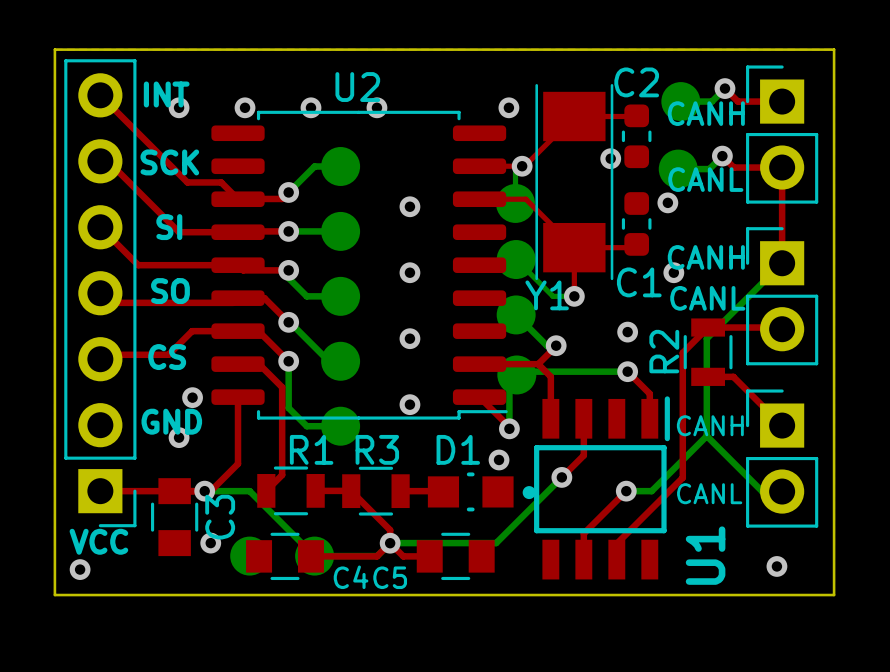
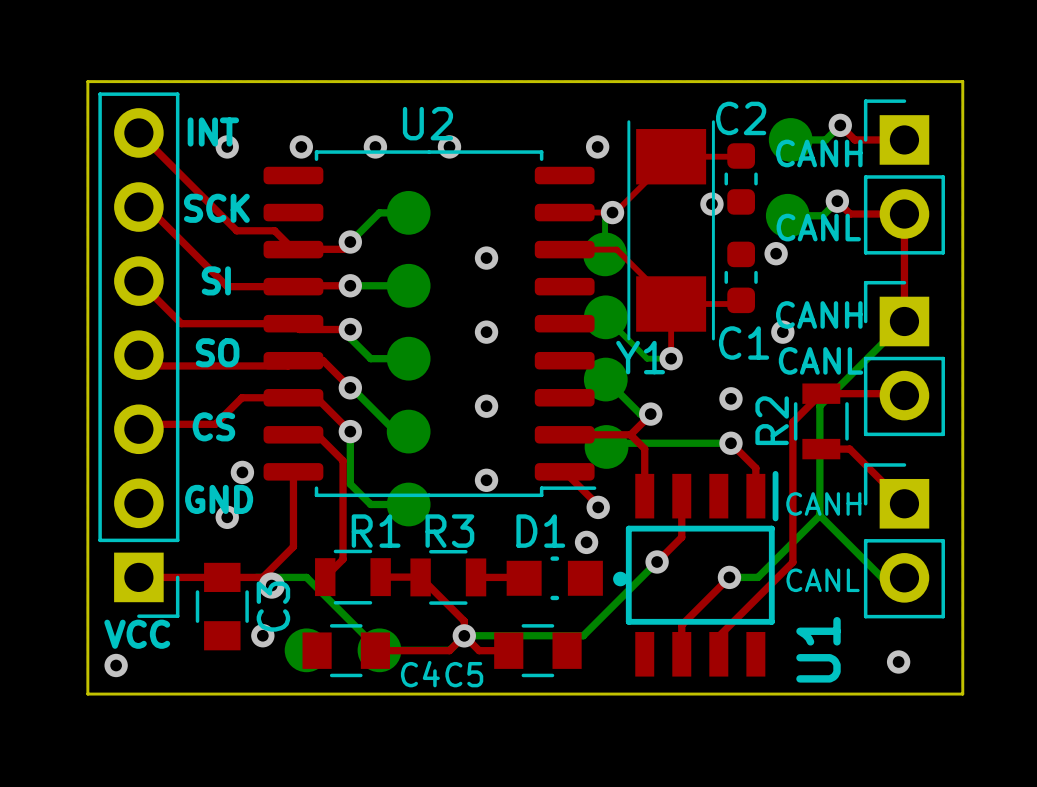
bottom track: (509, 382) (509, 428) -> none
via position: (204, 491) -> (271, 585)

